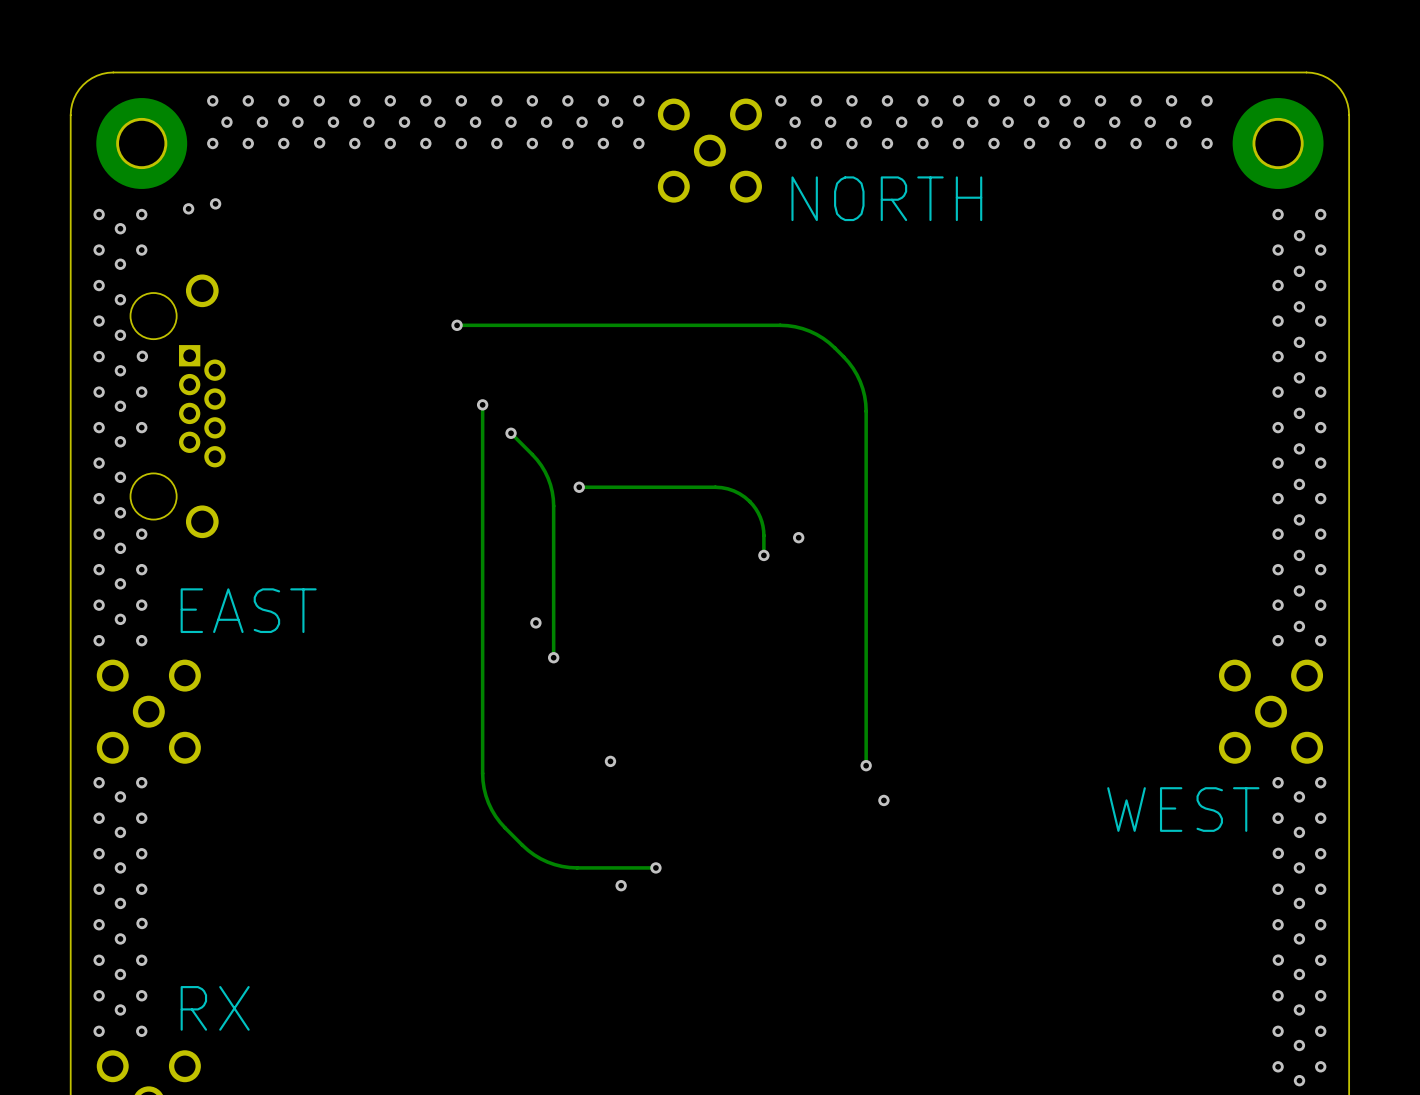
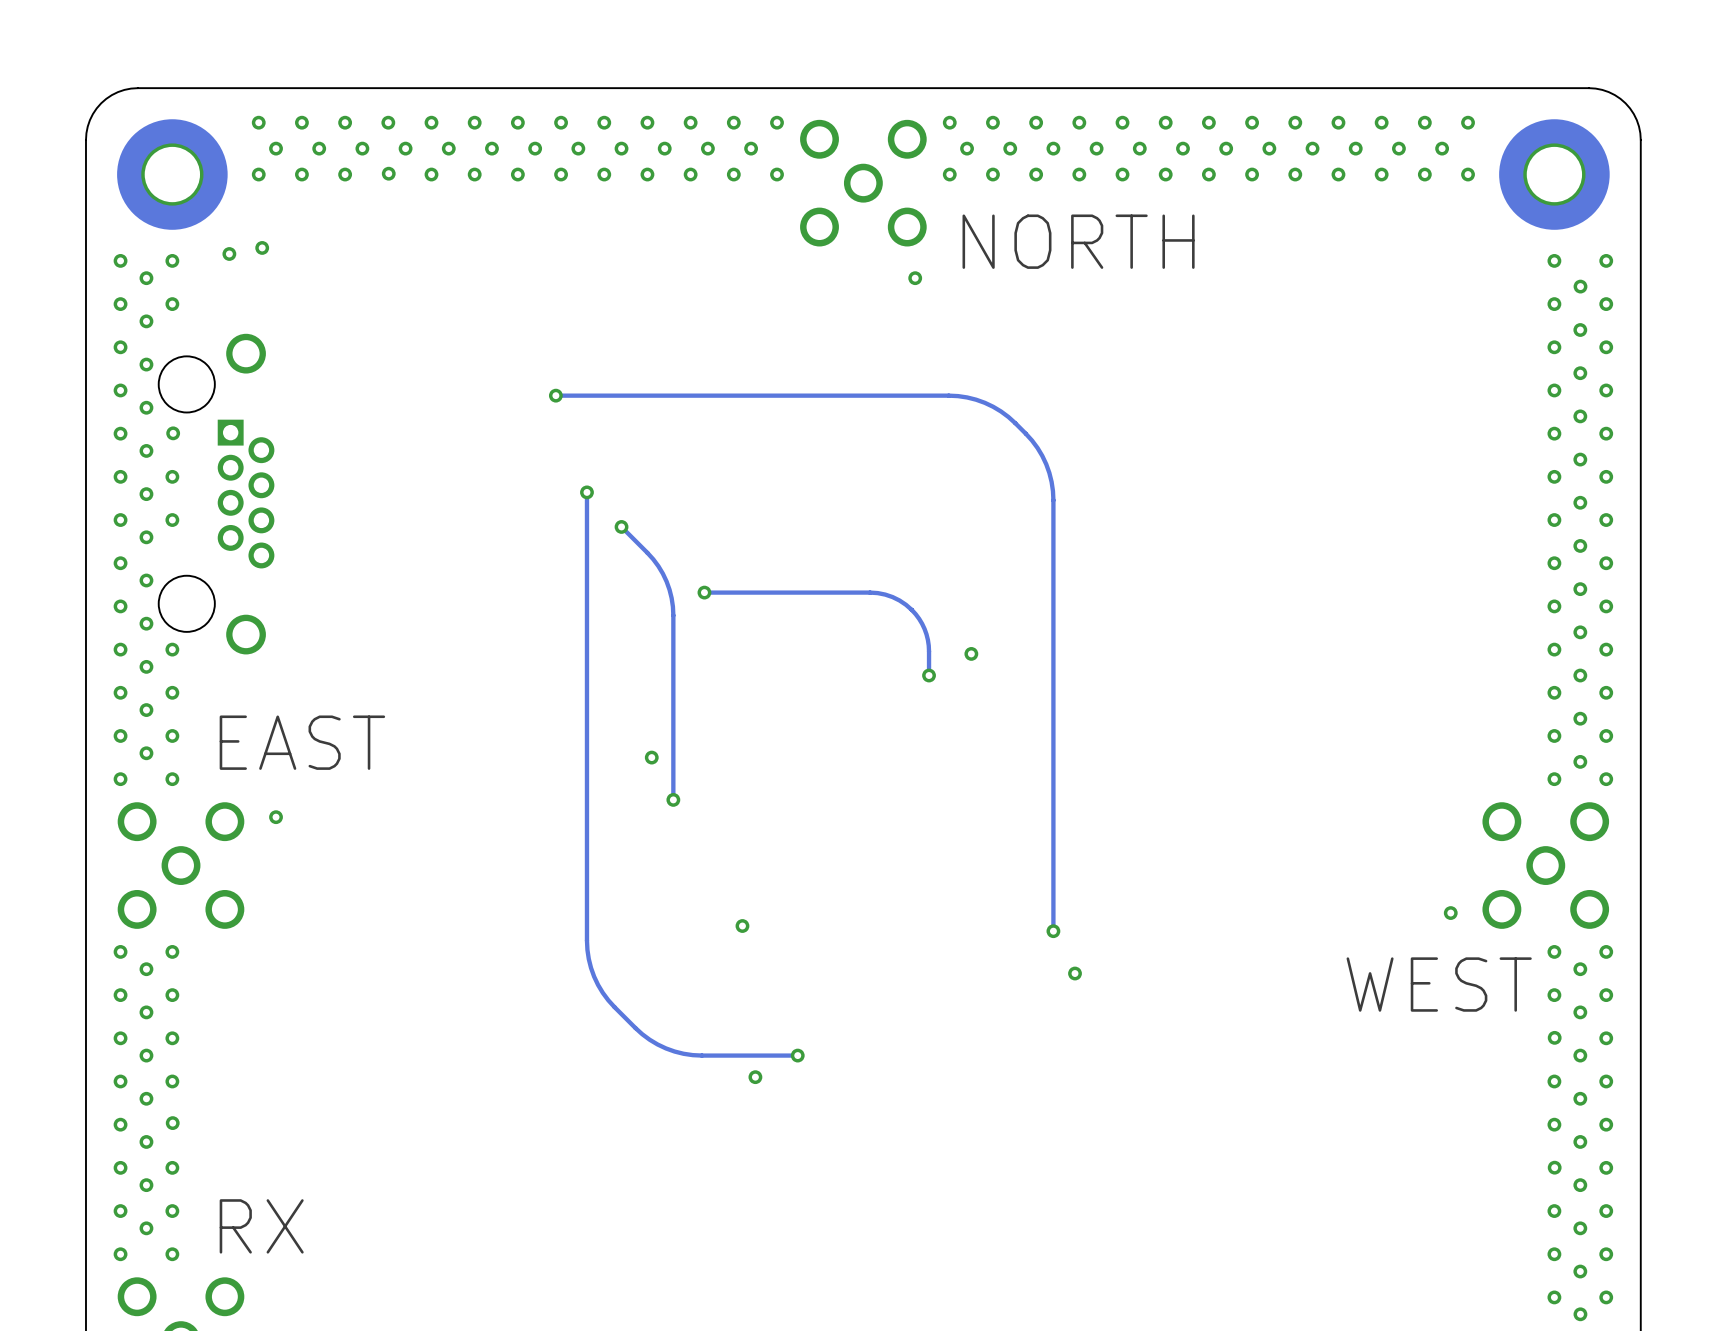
via: none -> (915, 278)
via: none -> (276, 817)
via: none -> (1450, 913)

